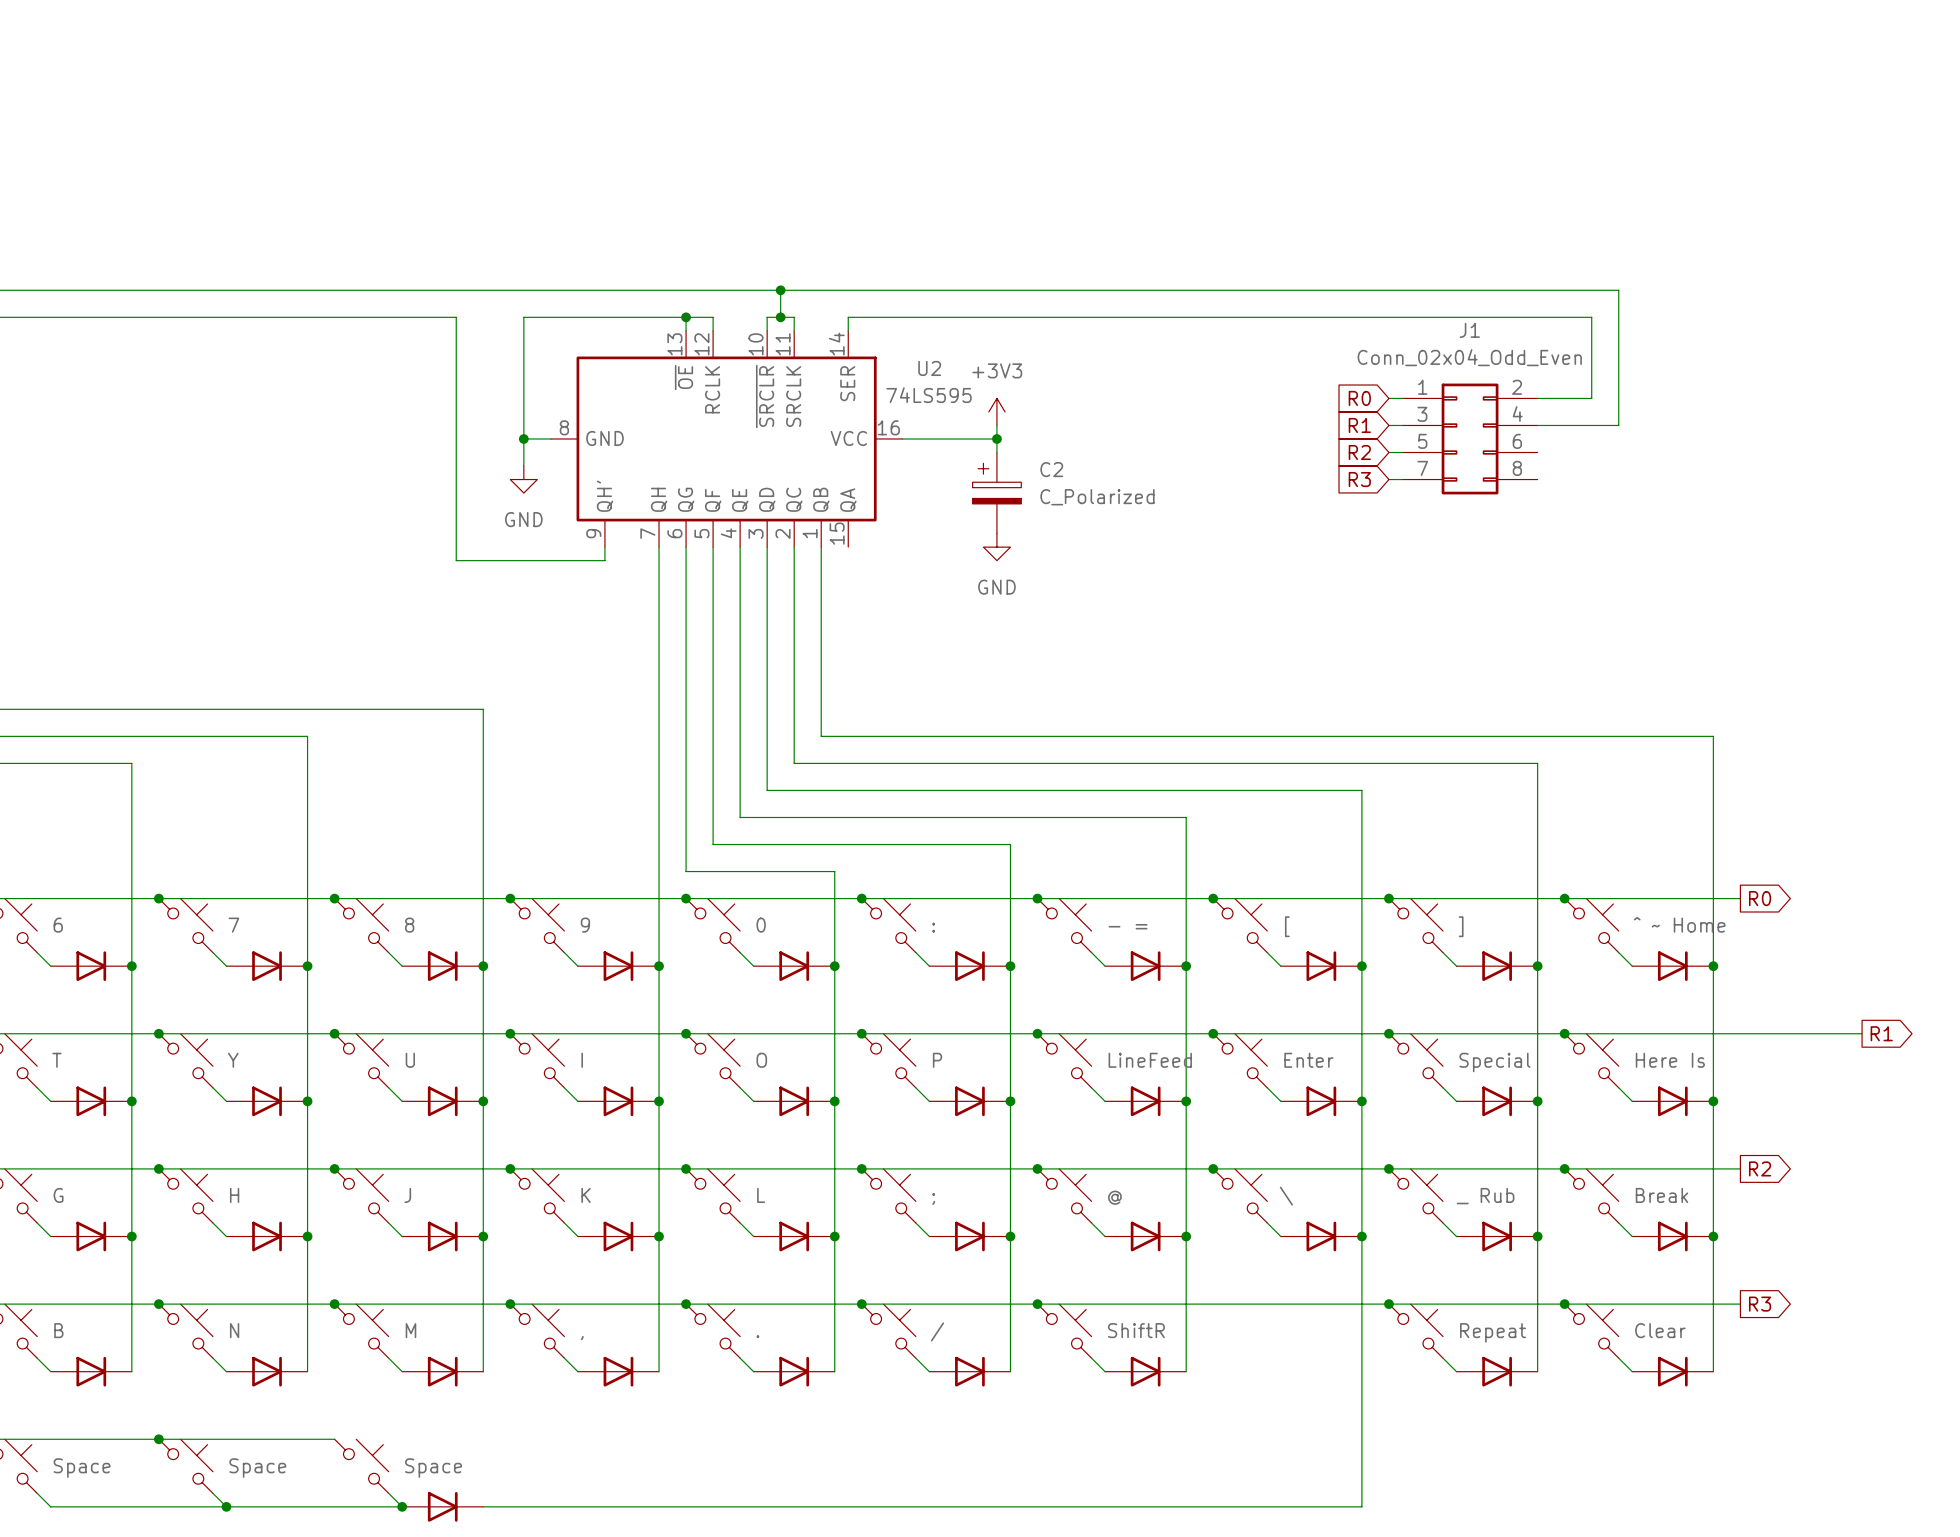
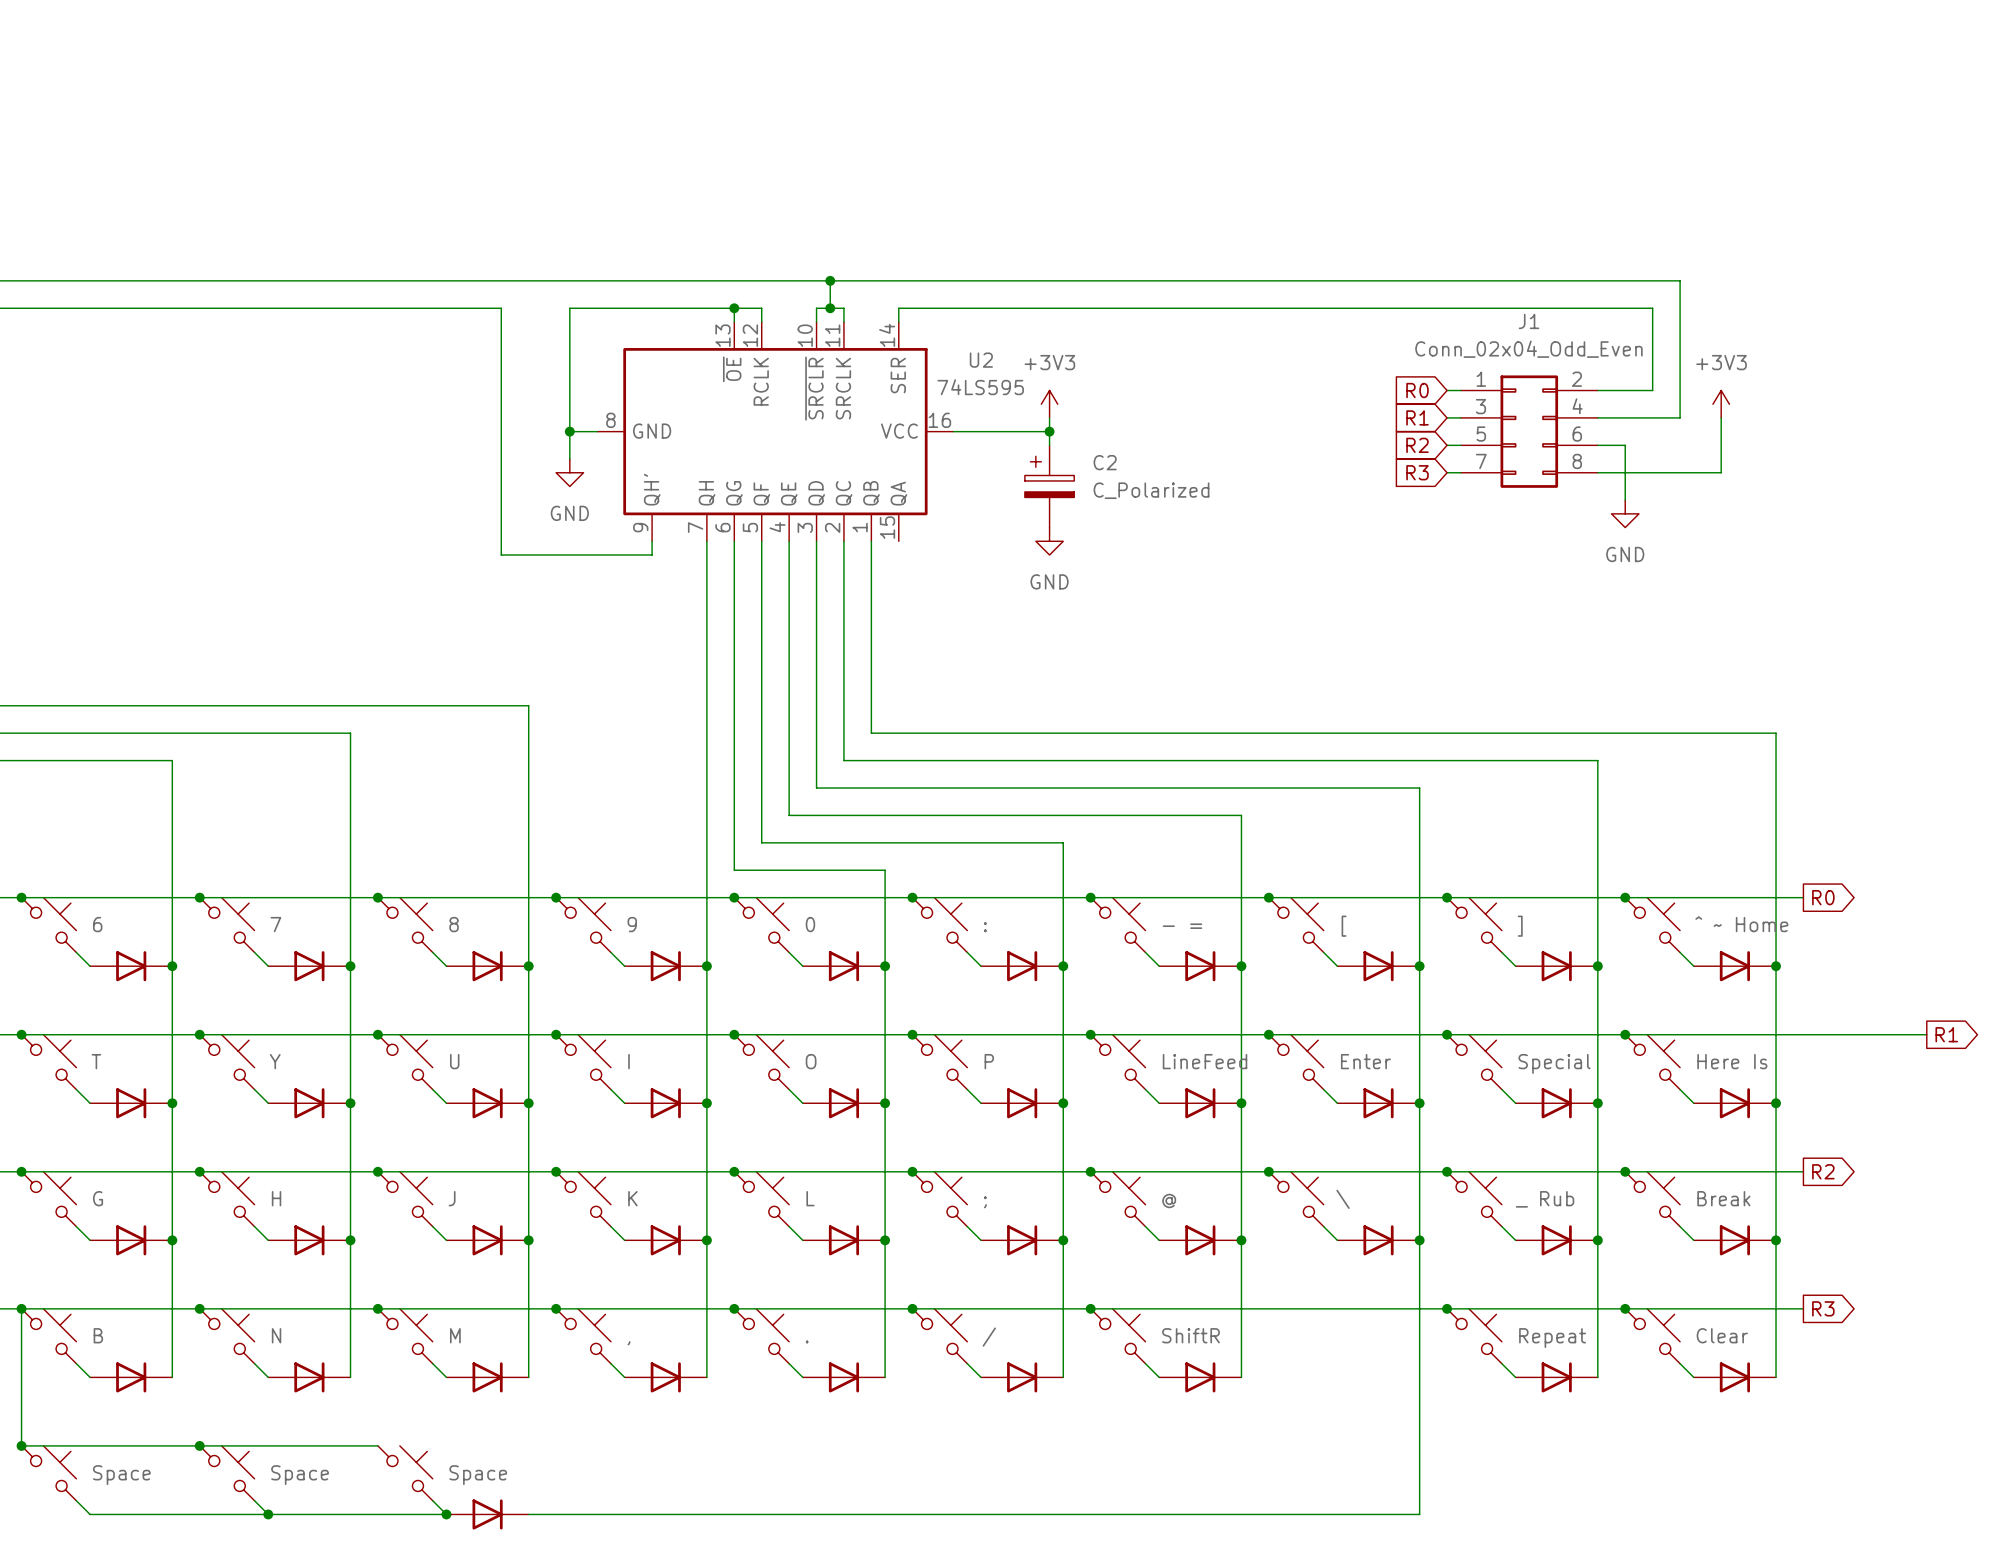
power symbol: none -> +3V3 (1721, 404)
wire: none -> (1721, 417) (1721, 472) (1597, 472)
wire: none -> (1597, 445) (1625, 445) (1625, 500)
power symbol: none -> GND (1625, 513)

